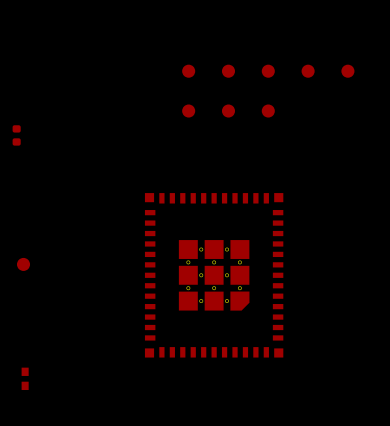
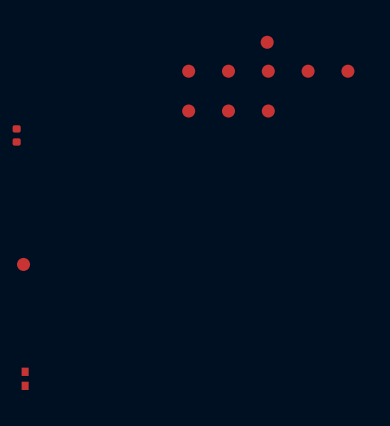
part: none -> (267, 42)
part: (214, 275) -> none

